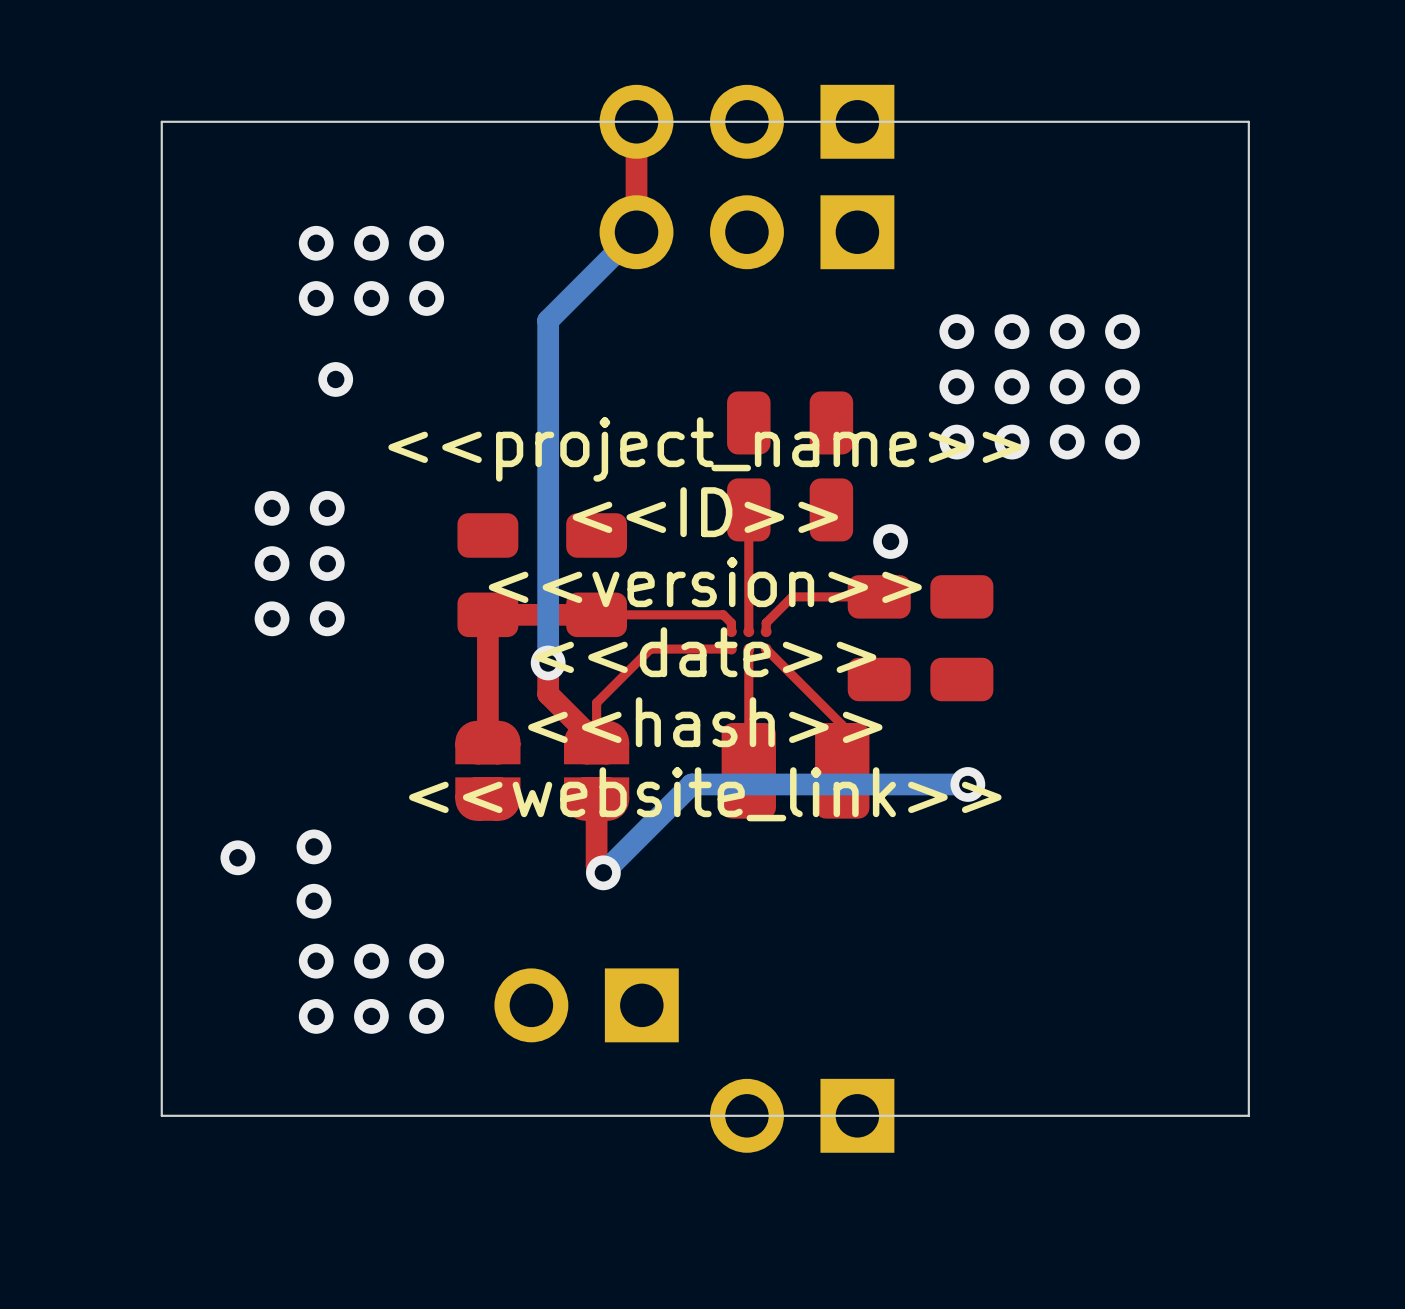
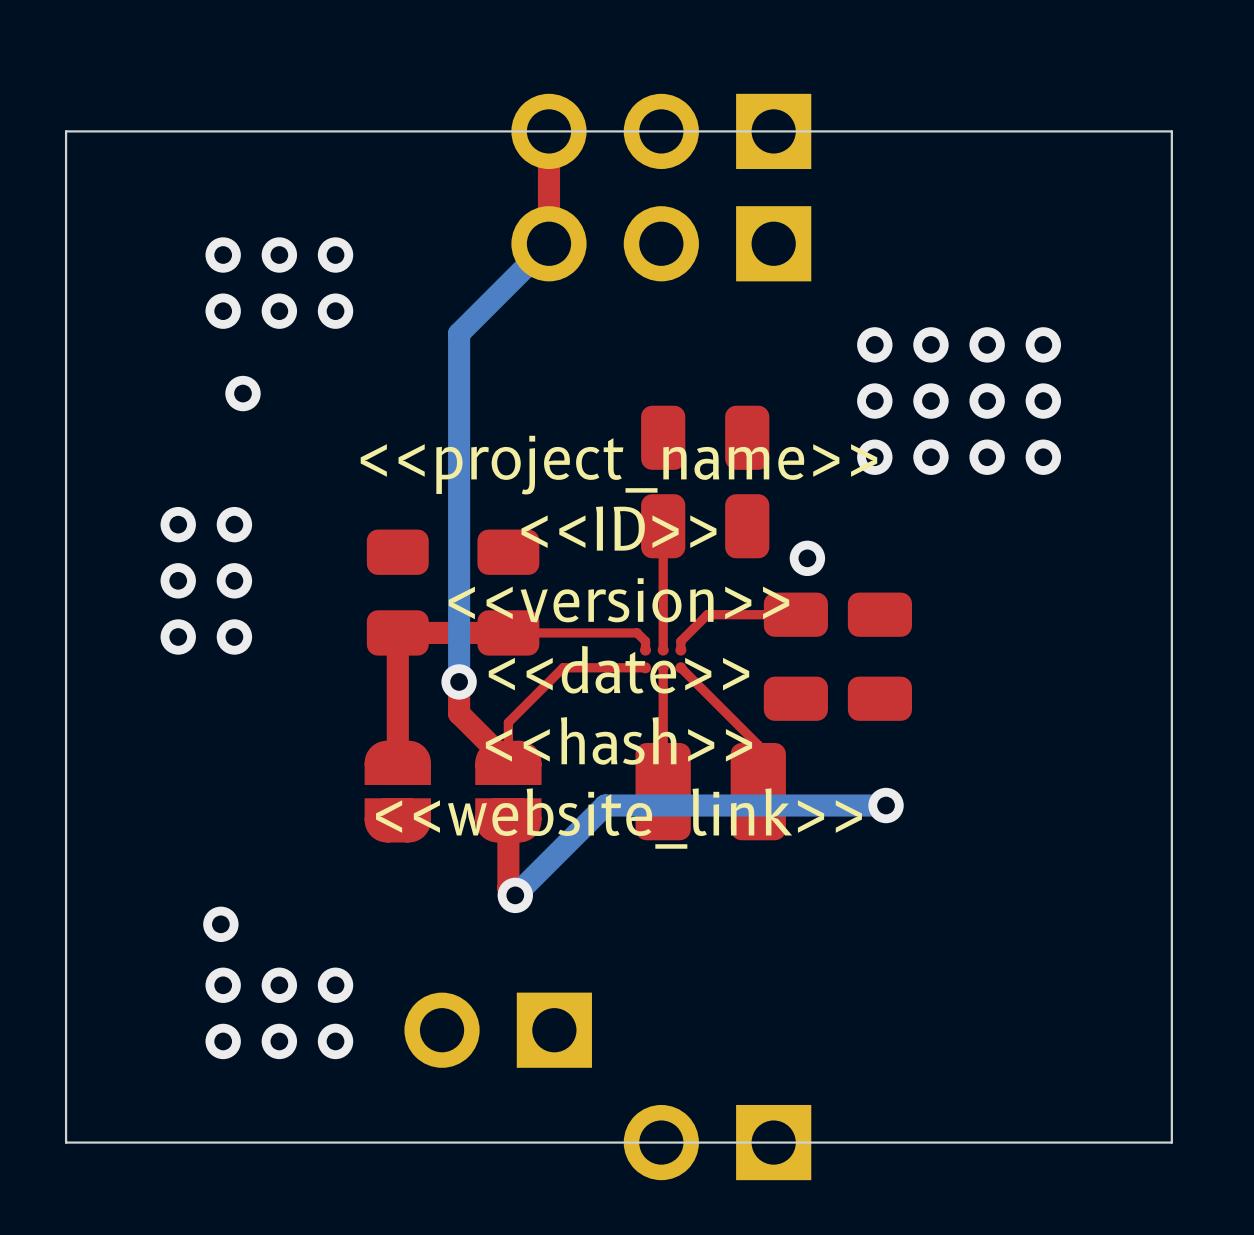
via: (313, 846) -> none
via: (237, 857) -> none

